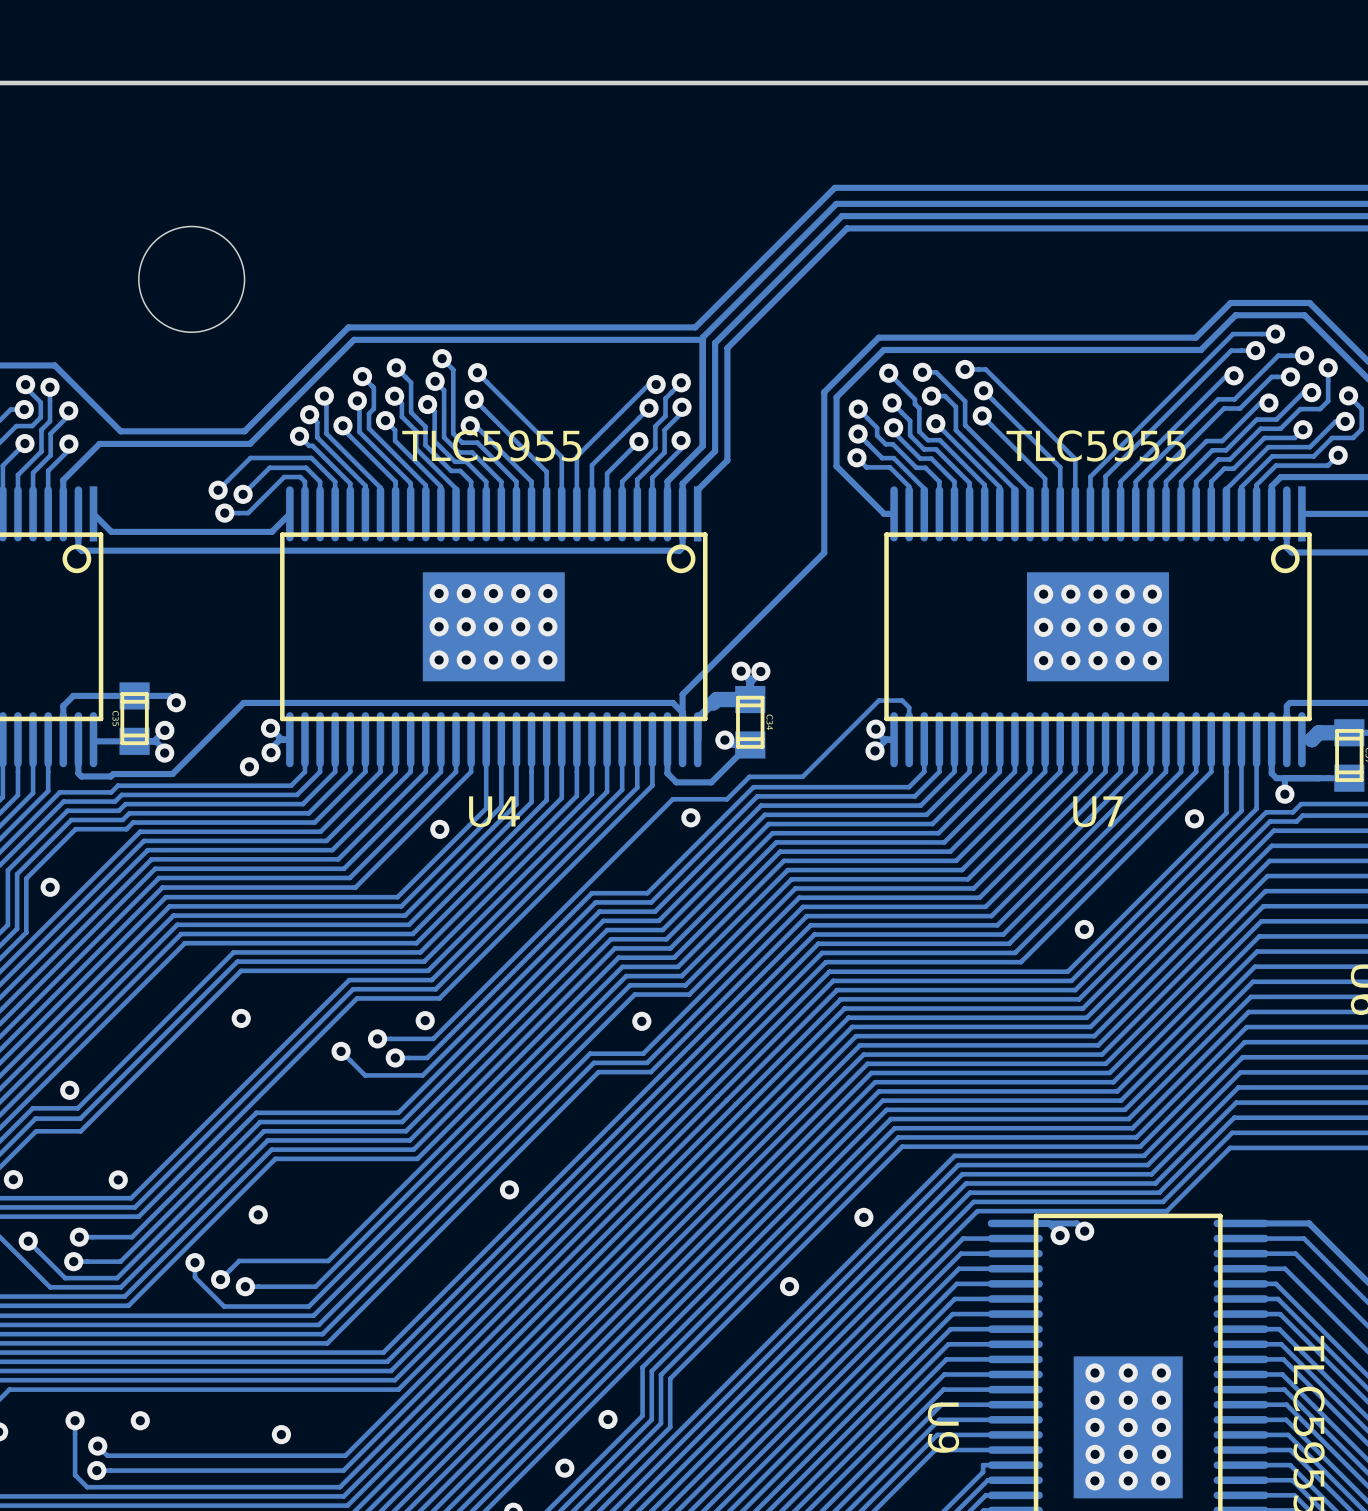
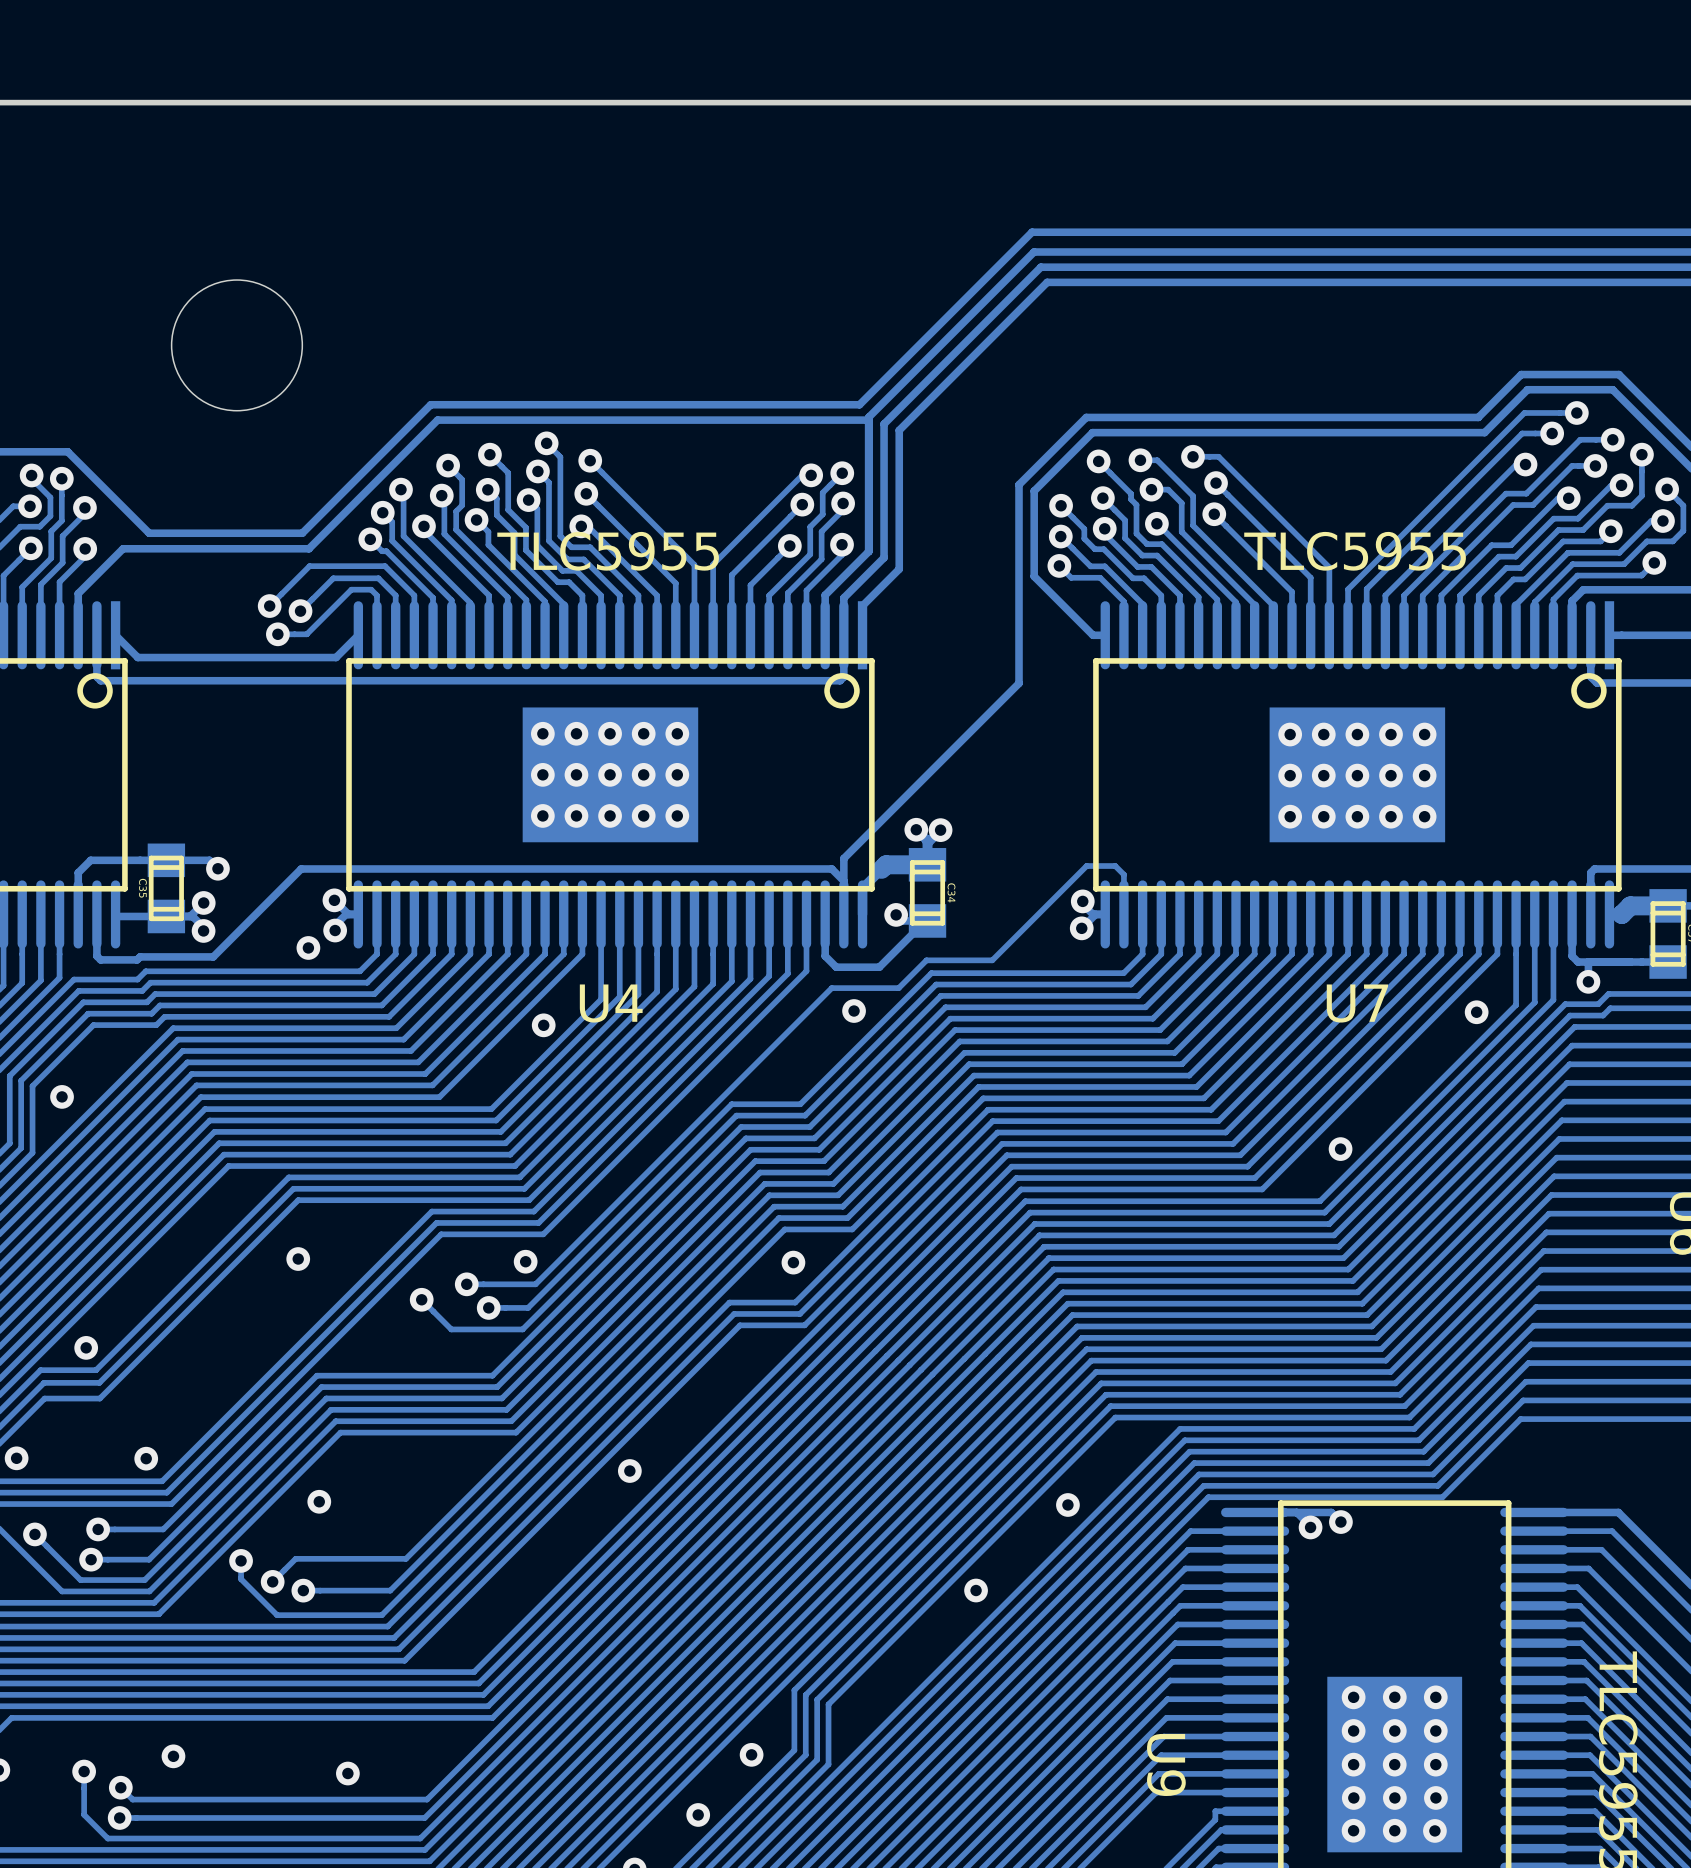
track: (75, 1420) (75, 1475) -> (84, 1771) (84, 1814) (92, 1823)
via position: (75, 1420) -> (84, 1771)

